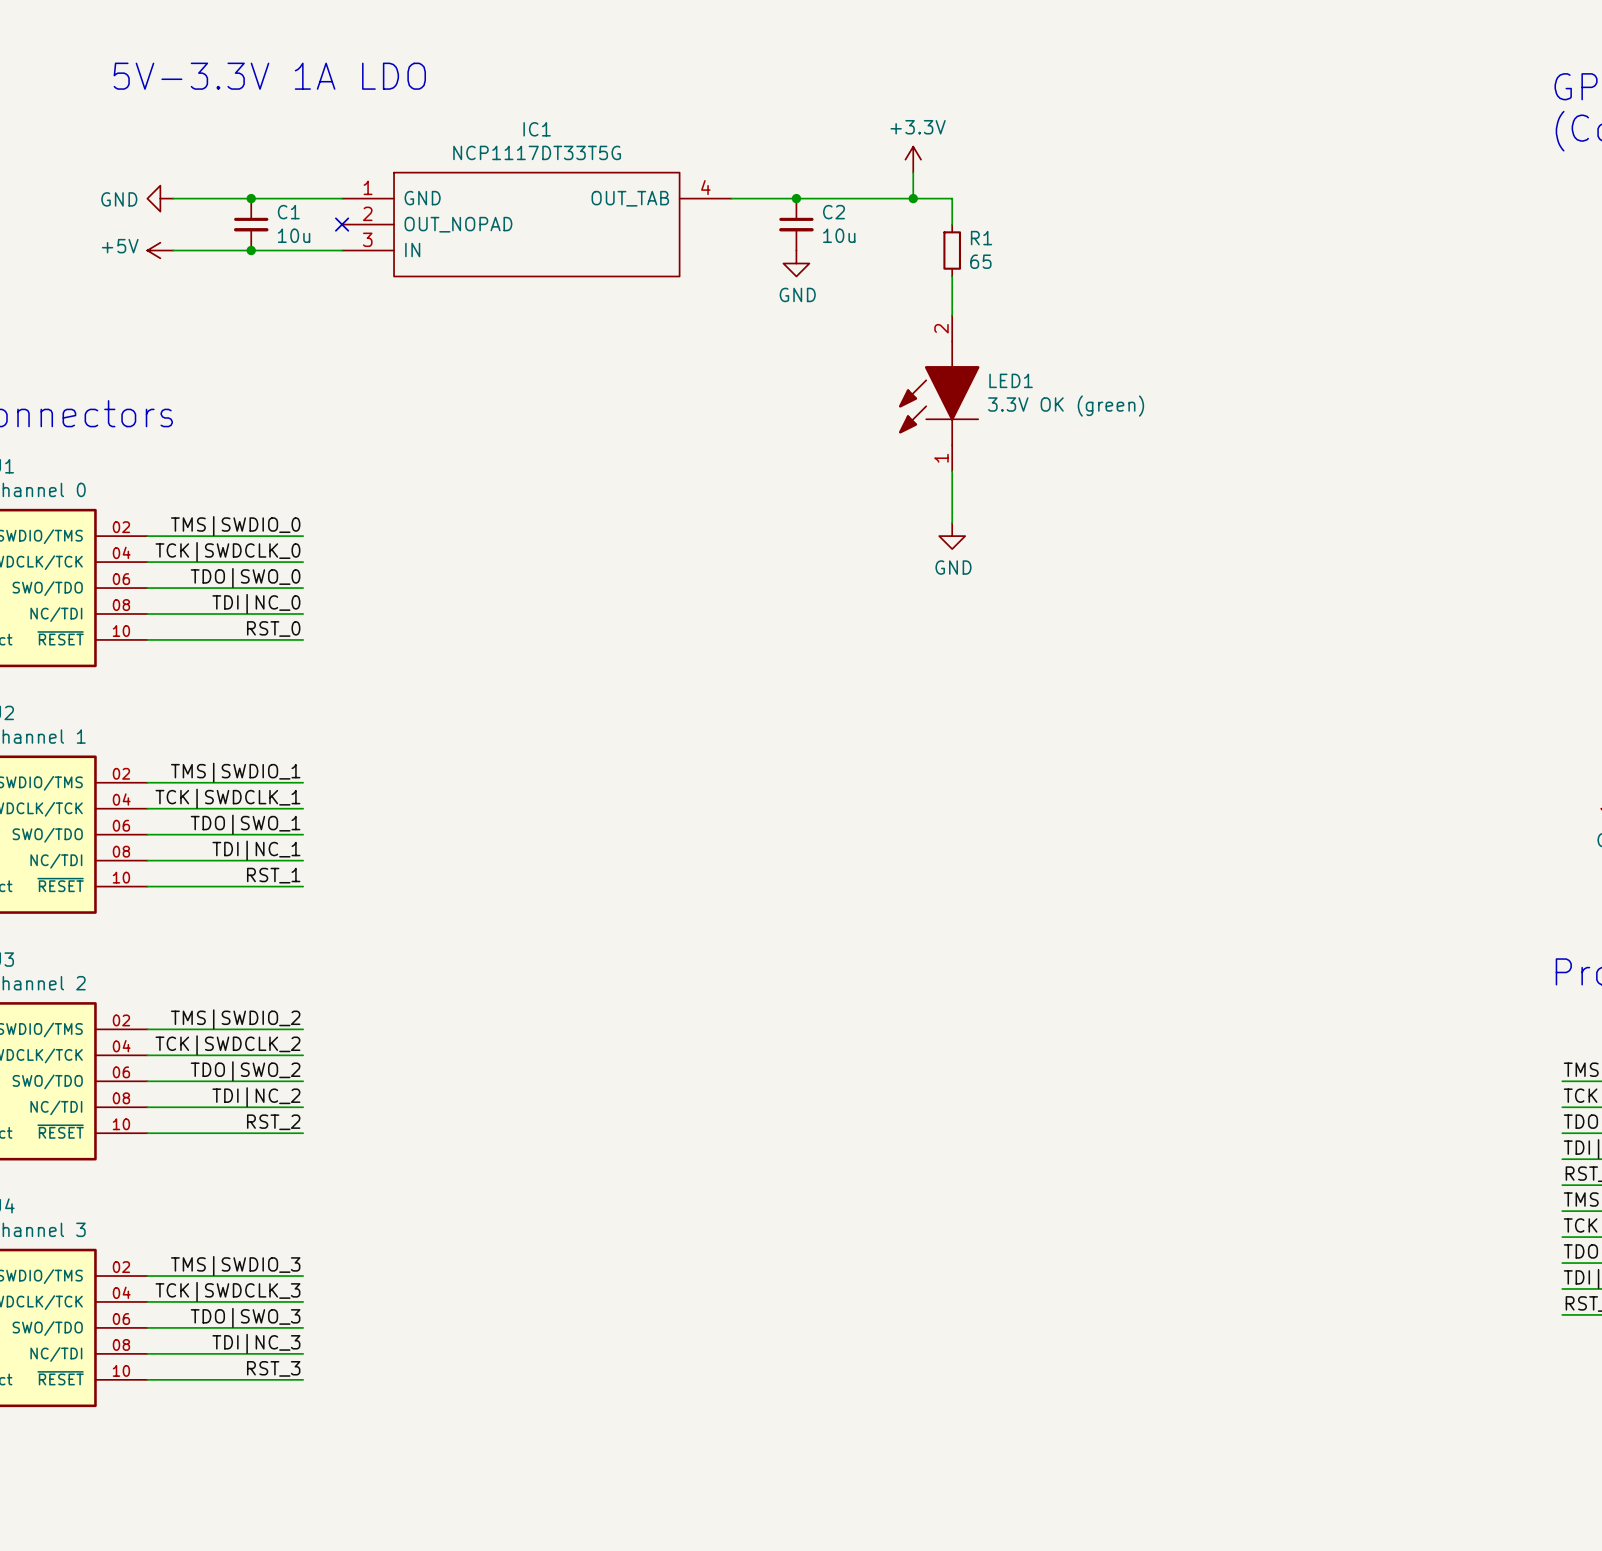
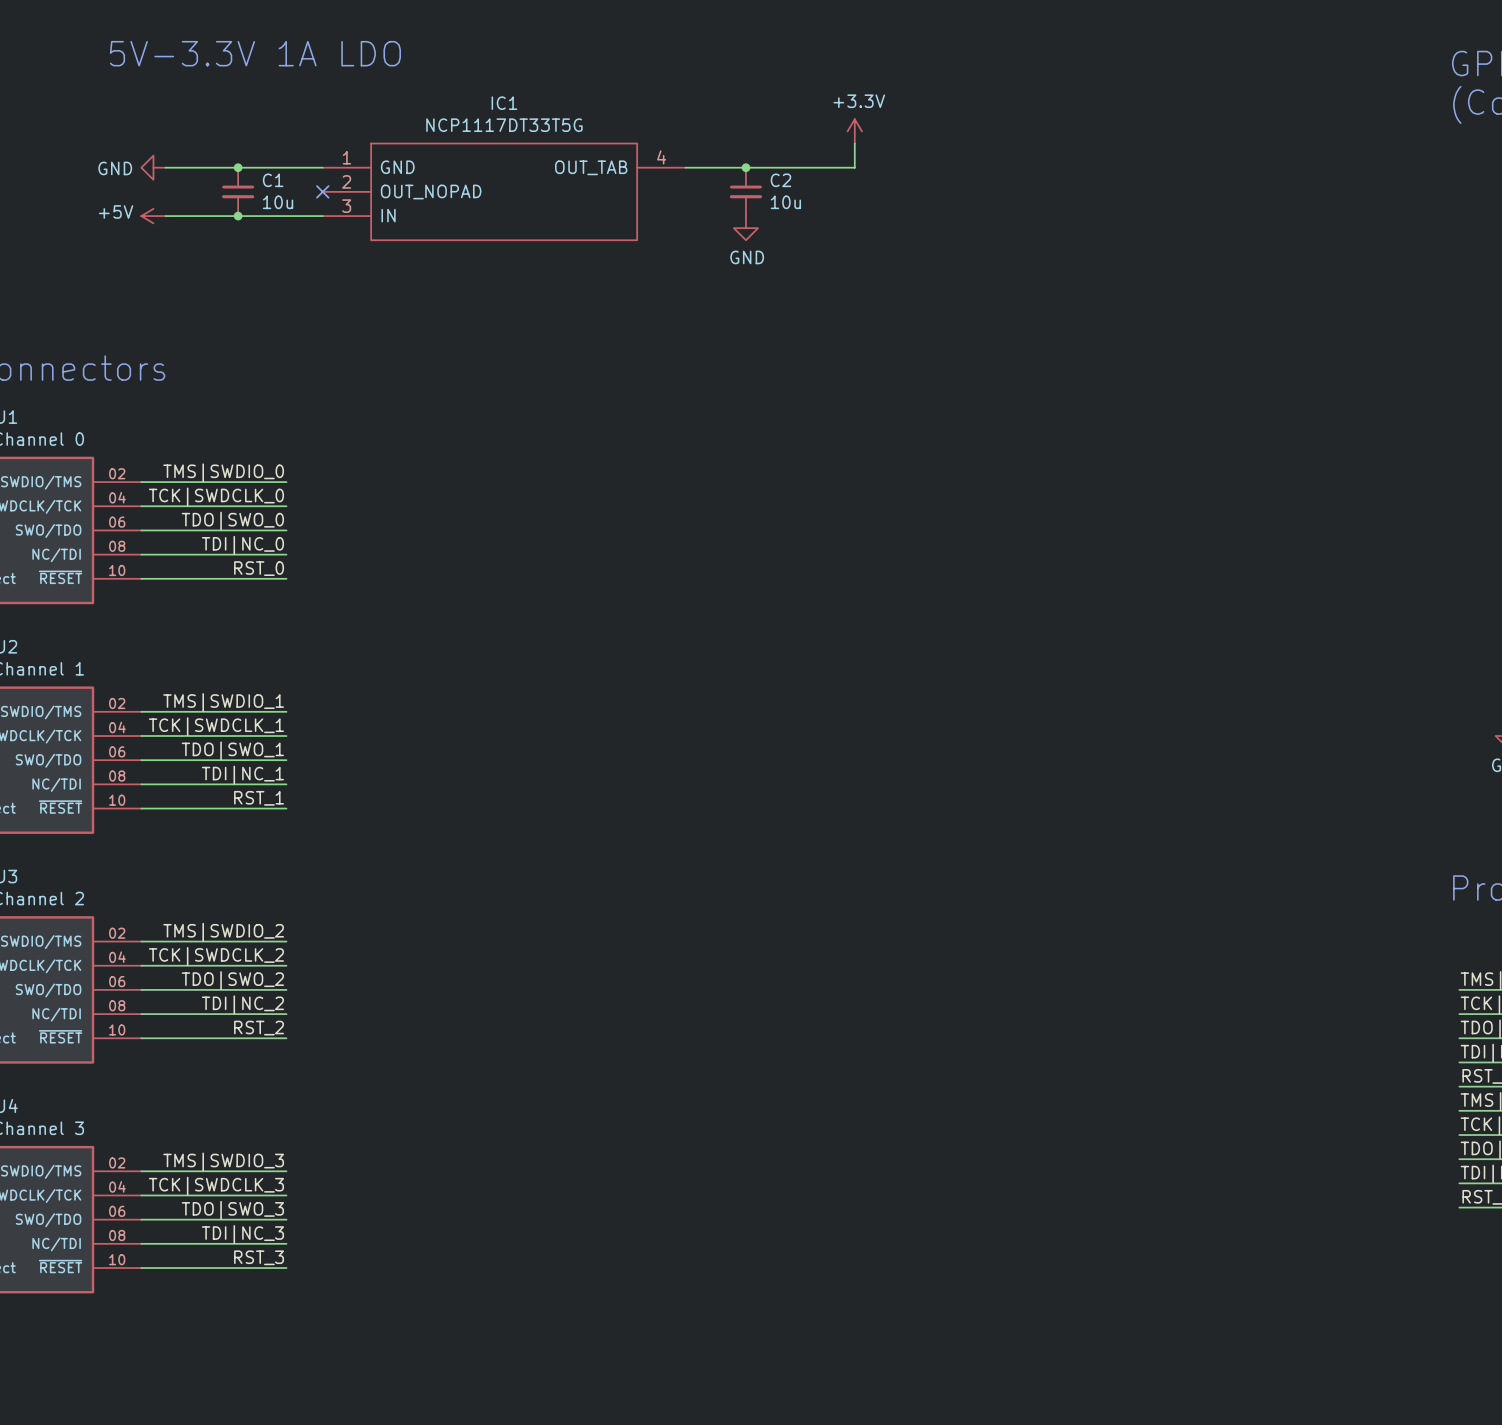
wire: (913, 198) (952, 198) (952, 224) -> none
junction: (913, 198) -> none
R1: 65 (952, 250) -> none
wire: (952, 276) (952, 315) -> none
LED1: 3.3V OK (green) (939, 393) -> none
wire: (952, 471) (952, 523) -> none
power symbol: GND (952, 536) -> none

